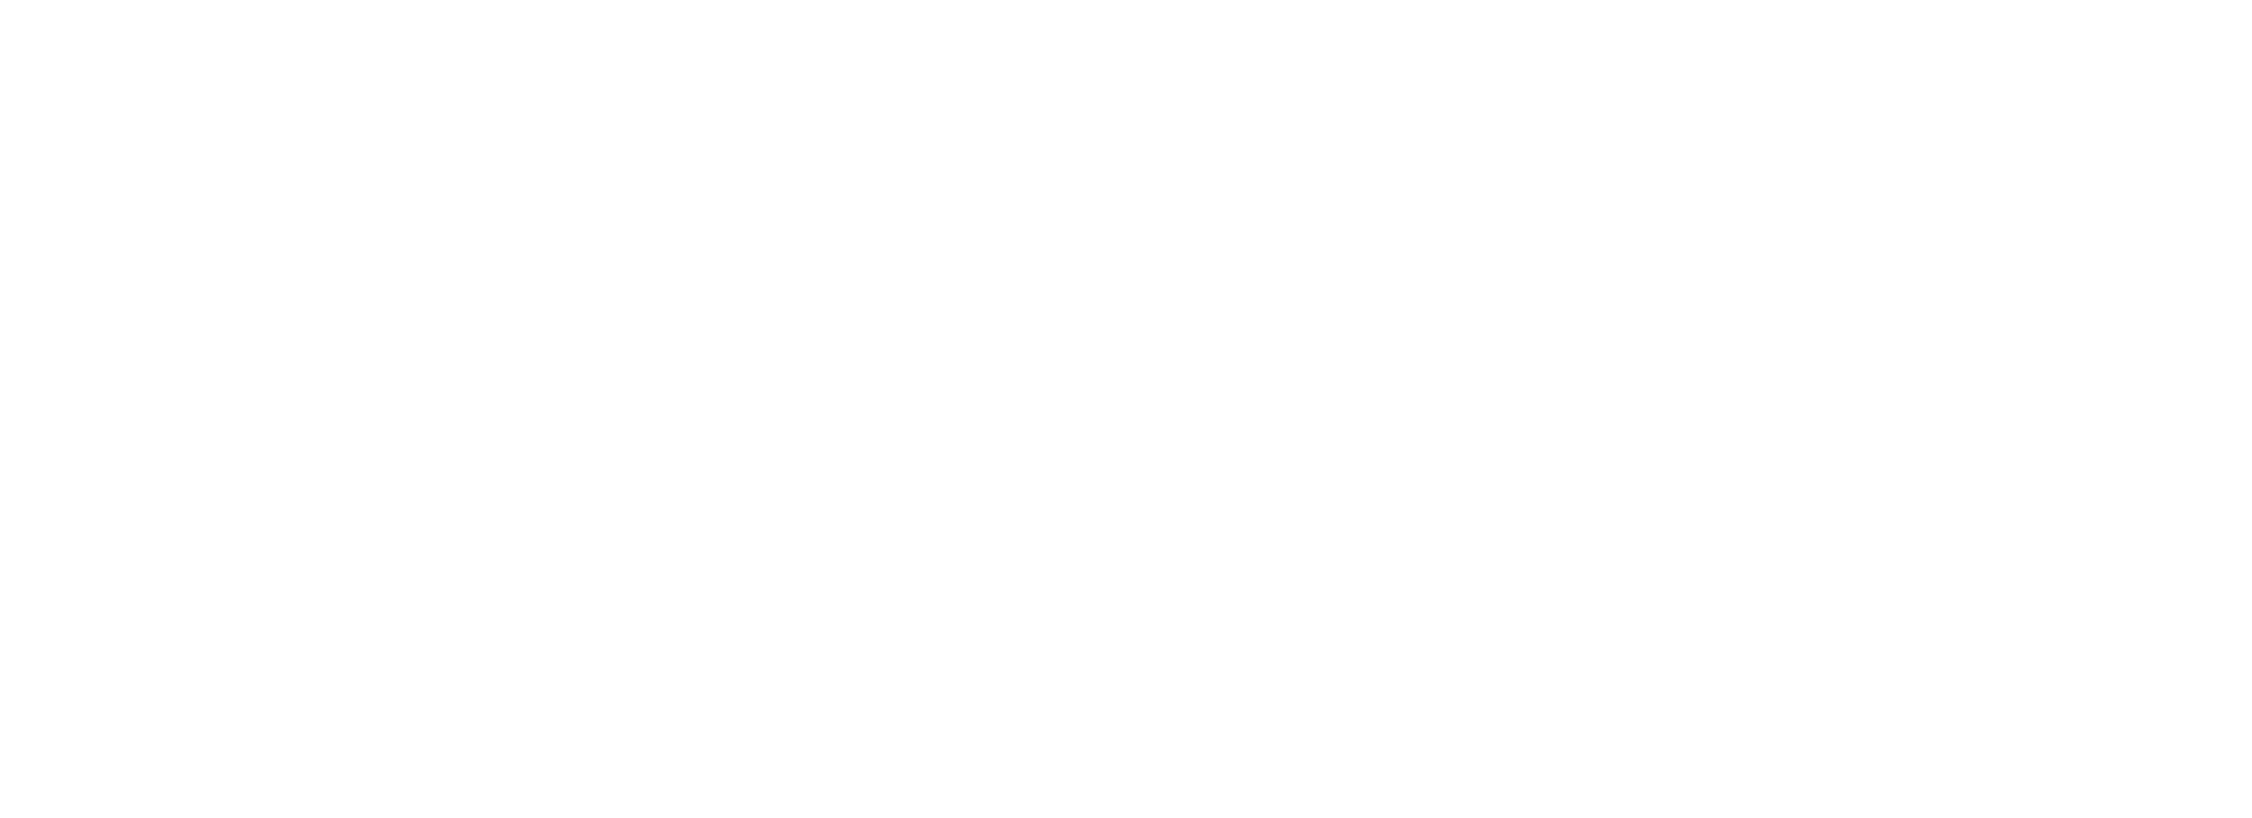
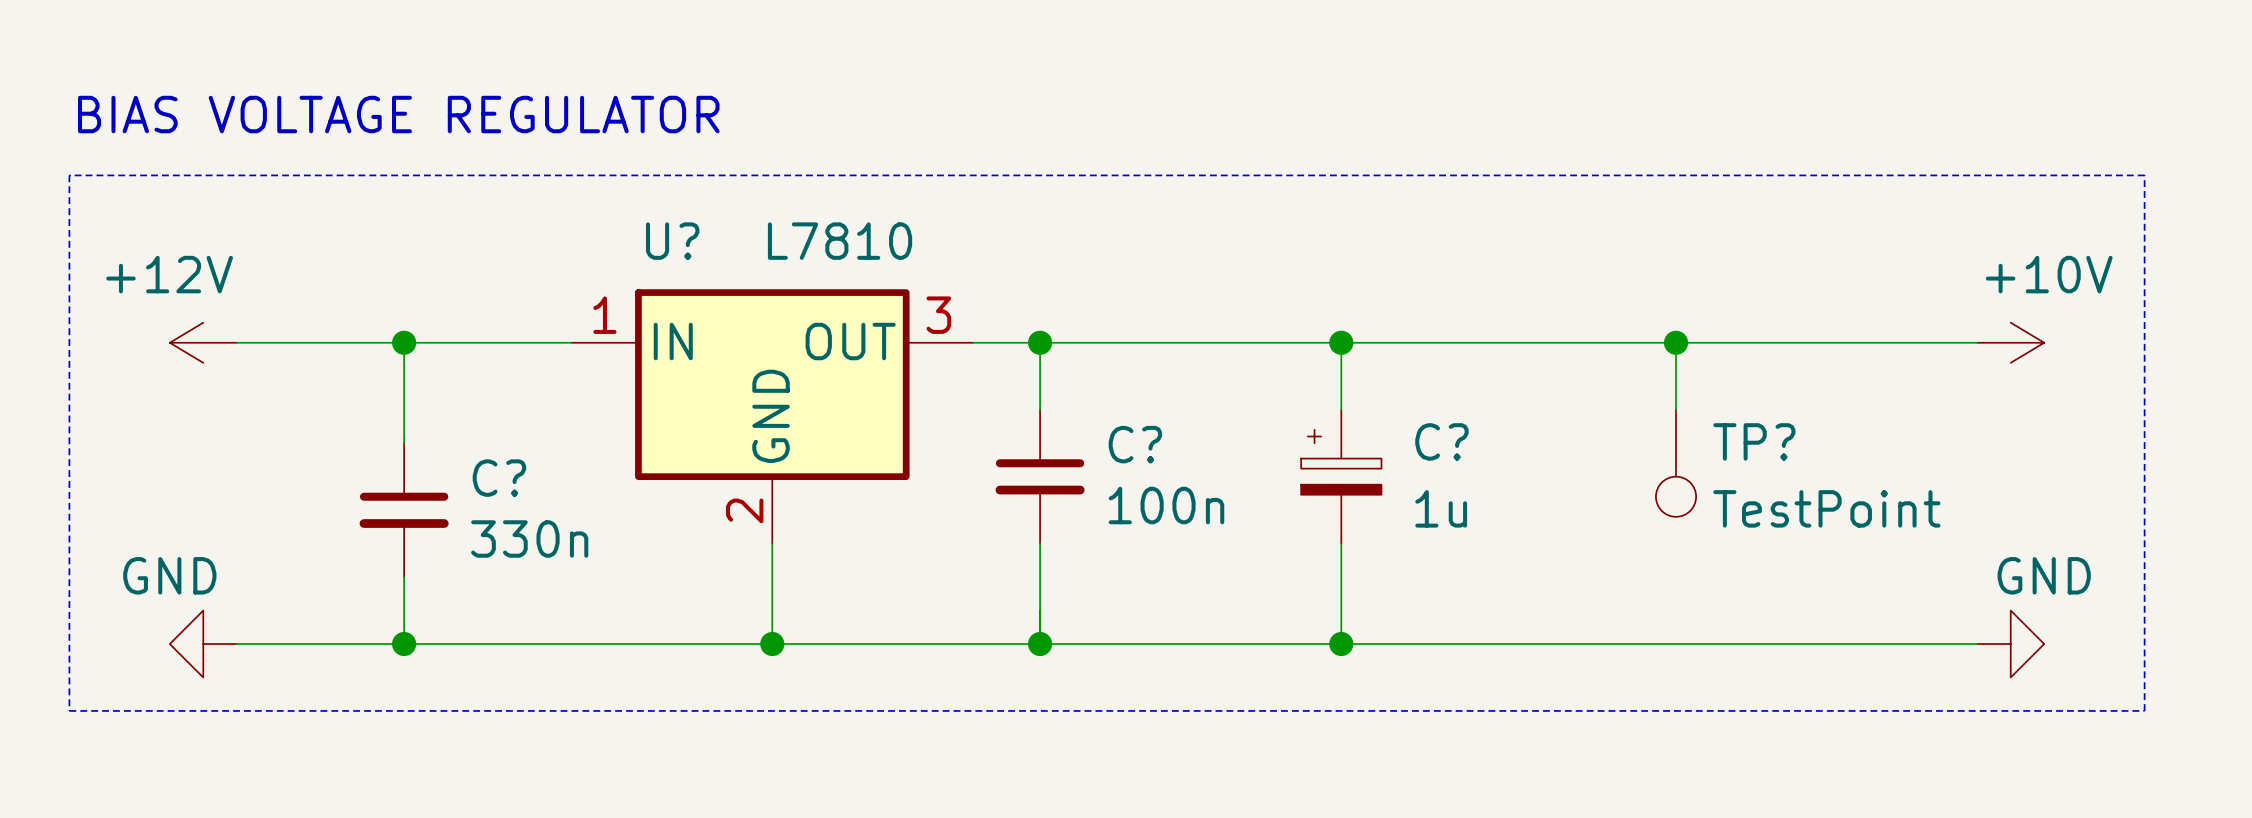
text: none -> BIAS VOLTAGE REGULATOR (398, 114)
line: none -> (69, 175) (2144, 175) (2144, 710) (69, 710) (69, 175)
power symbol: none -> +12V (203, 342)
wire: none -> (236, 342) (571, 342)
wire: none -> (404, 342) (404, 443)
junction: none -> (404, 342)
wire: none -> (973, 342) (1977, 342)
wire: none -> (1040, 342) (1040, 409)
junction: none -> (1040, 342)
wire: none -> (1341, 342) (1341, 409)
junction: none -> (1341, 342)
wire: none -> (1676, 342) (1676, 409)
junction: none -> (1676, 342)
power symbol: none -> +10V (2010, 342)
U?: none -> L7810 (772, 416)
TP?: none -> TestPoint (1676, 463)
C?: none -> 100n (1040, 476)
C?: none -> 1u (1341, 476)
C?: none -> 330n (404, 510)
wire: none -> (772, 543) (772, 644)
wire: none -> (1040, 543) (1040, 644)
wire: none -> (1341, 543) (1341, 644)
wire: none -> (404, 577) (404, 644)
power symbol: none -> GND (203, 644)
wire: none -> (236, 644) (1977, 644)
junction: none -> (404, 644)
junction: none -> (772, 644)
junction: none -> (1040, 644)
junction: none -> (1341, 644)
power symbol: none -> GND (2010, 644)

